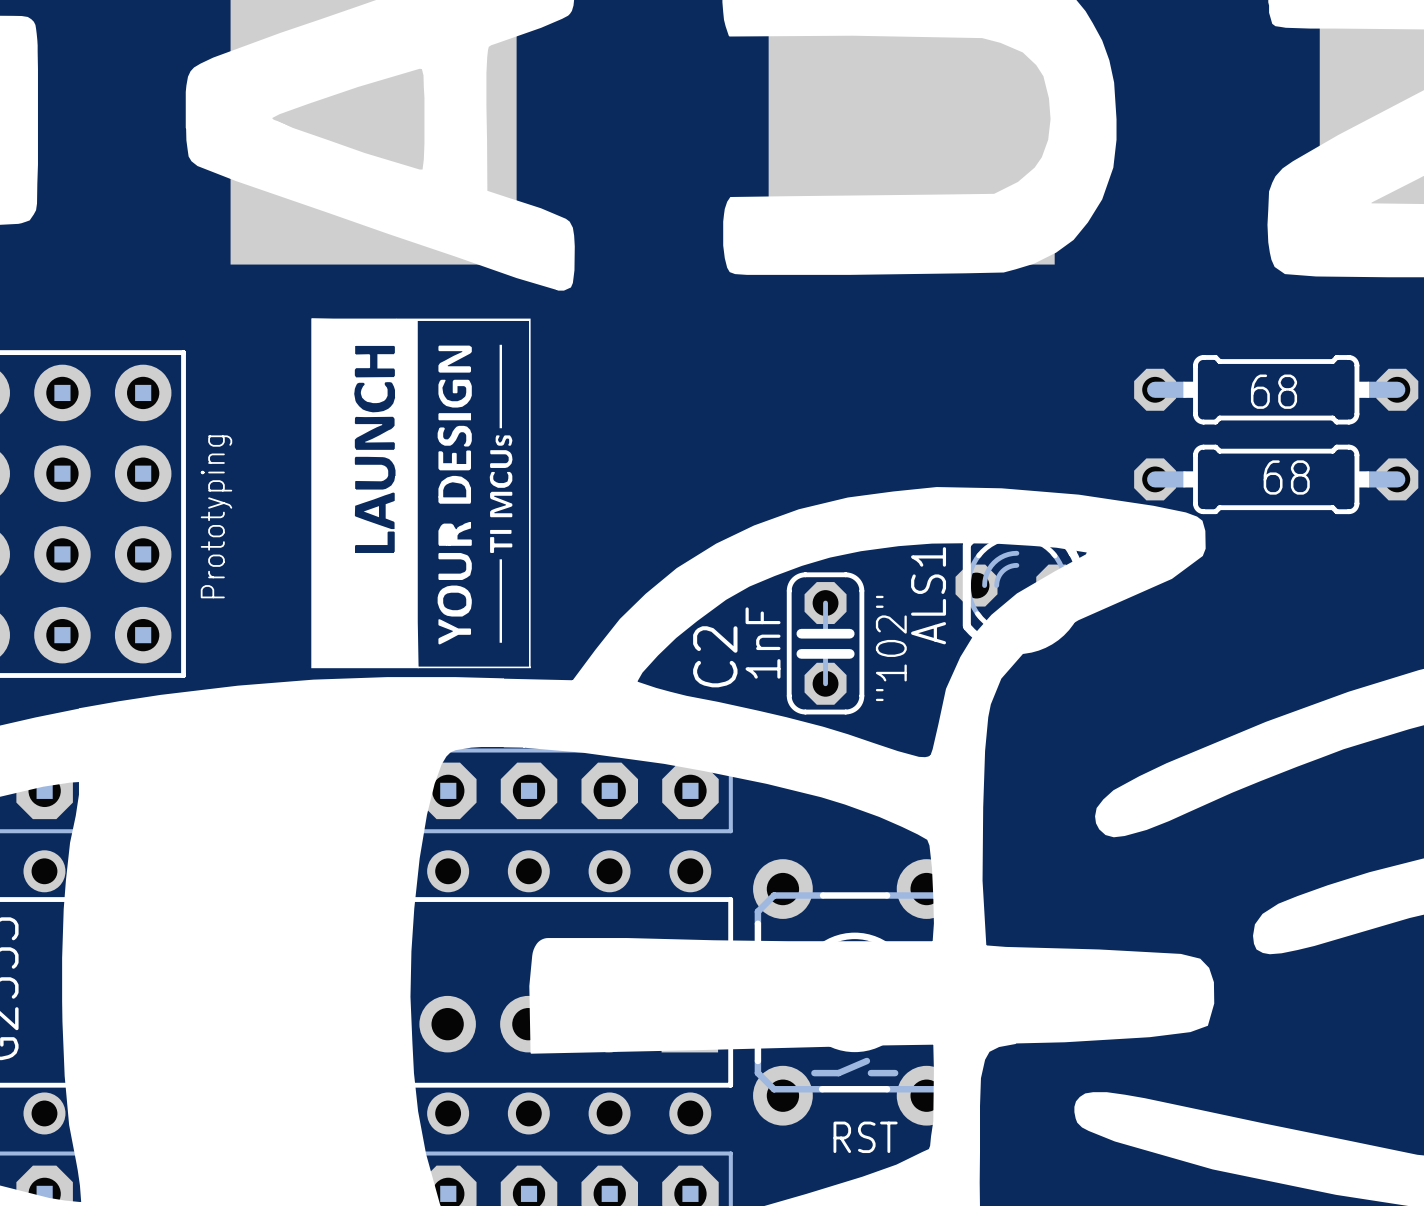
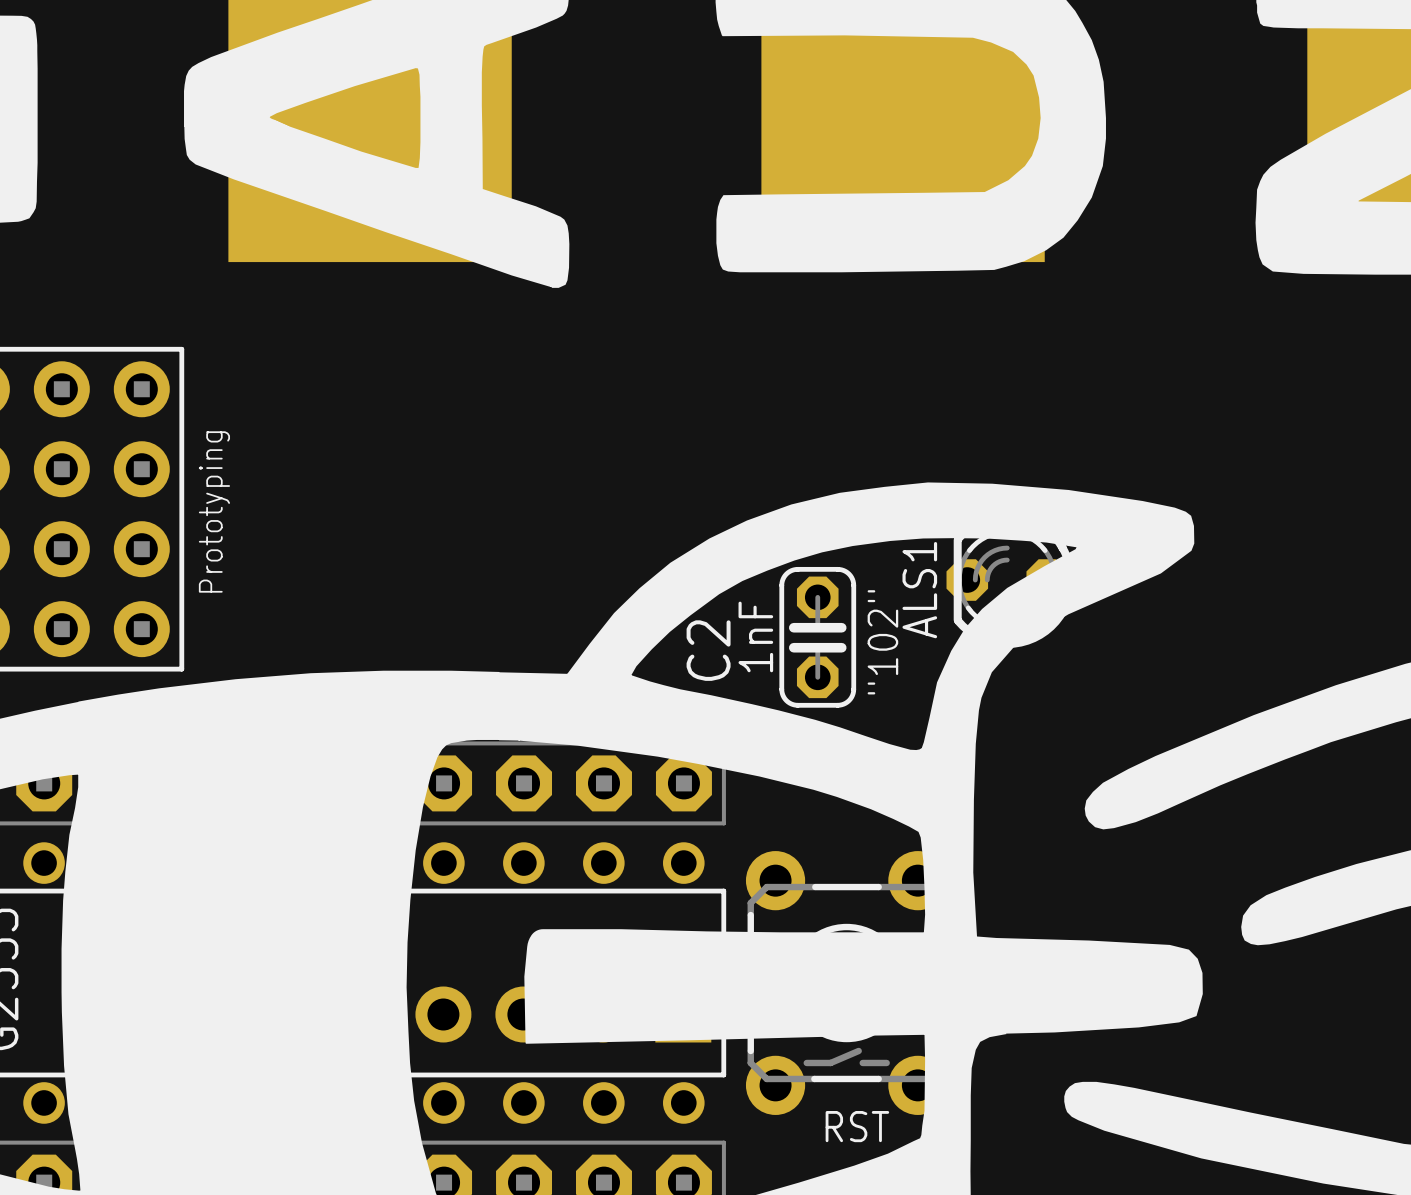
drawing: [311, 318, 531, 669] -> none
part: (1276, 389) -> none
text: 68 (1274, 391) -> none
text: 68 (1286, 477) -> none
part: (1276, 479) -> none

